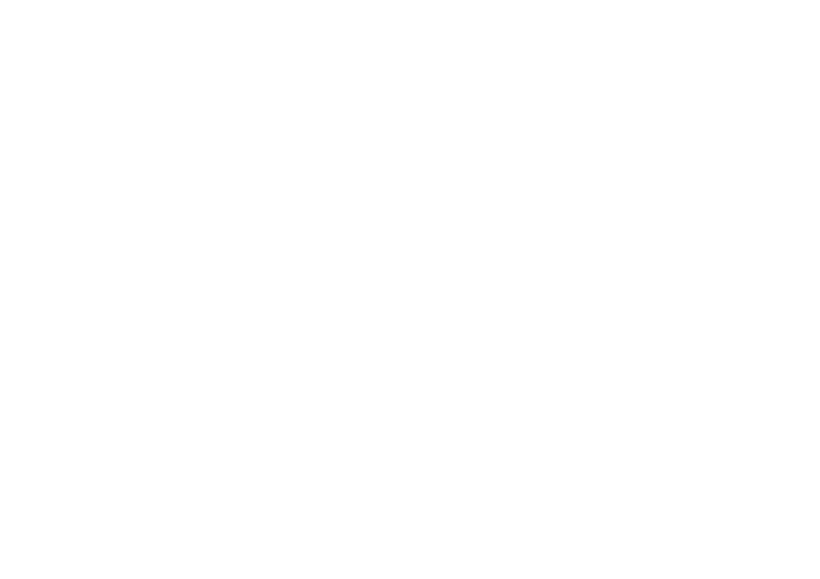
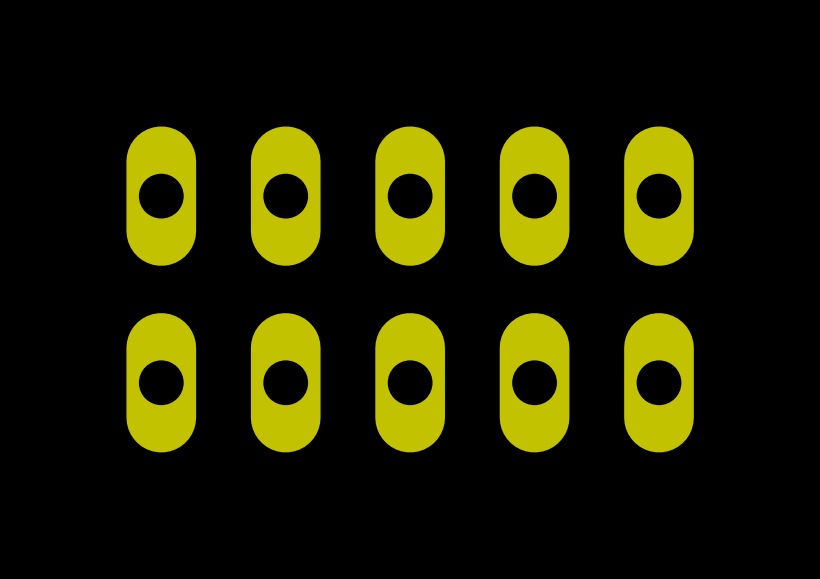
part: none -> (410, 196)
part: none -> (410, 382)

